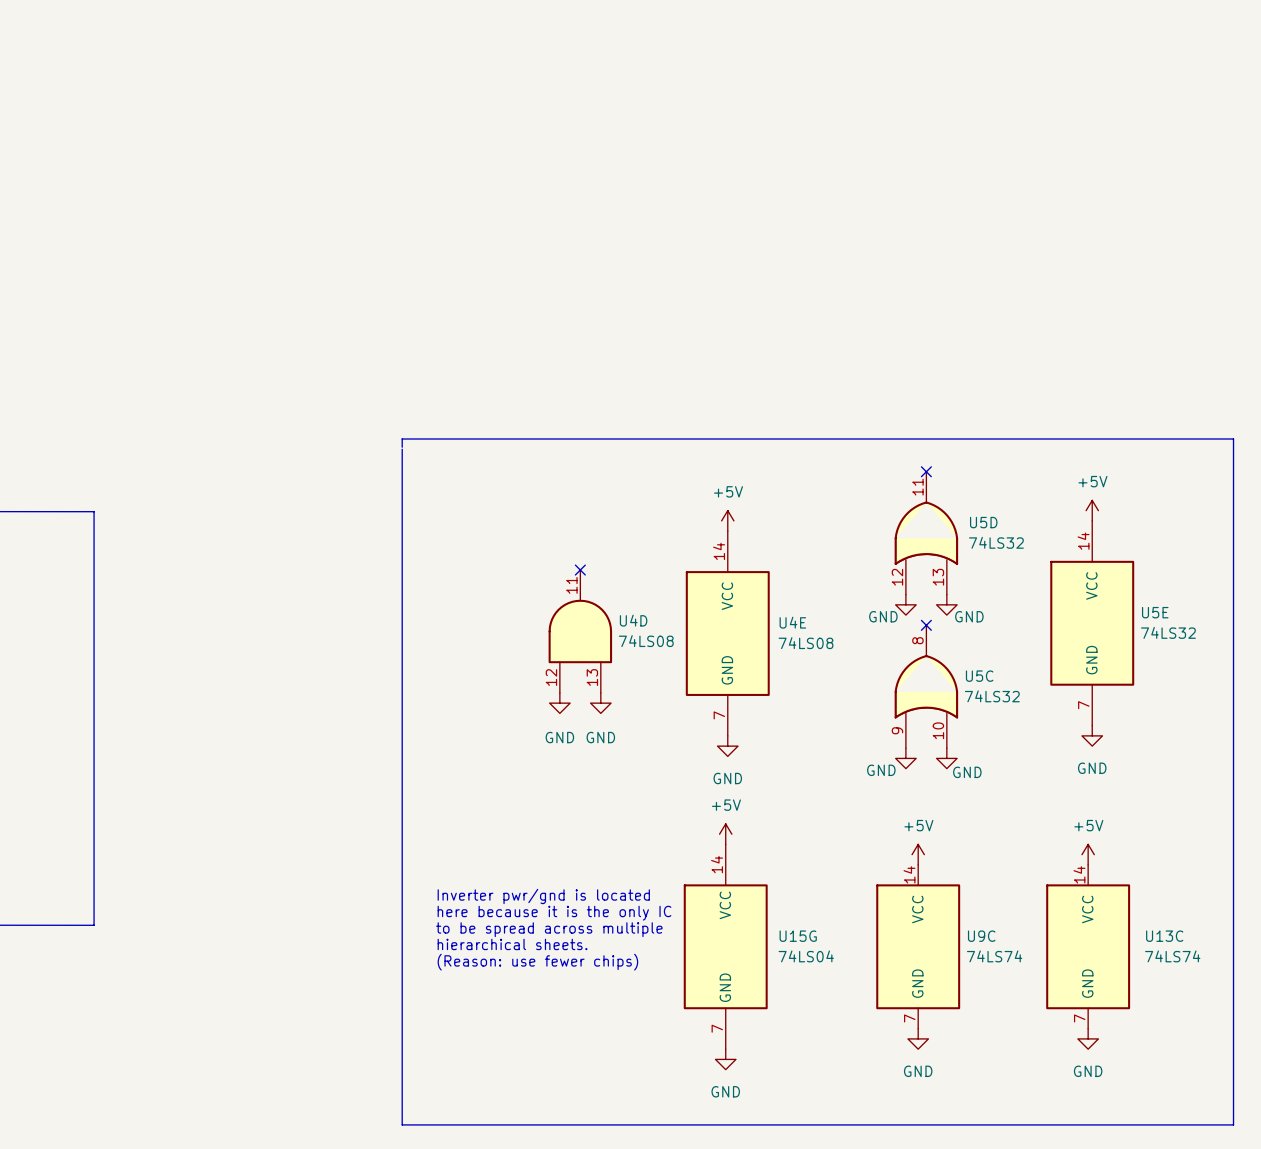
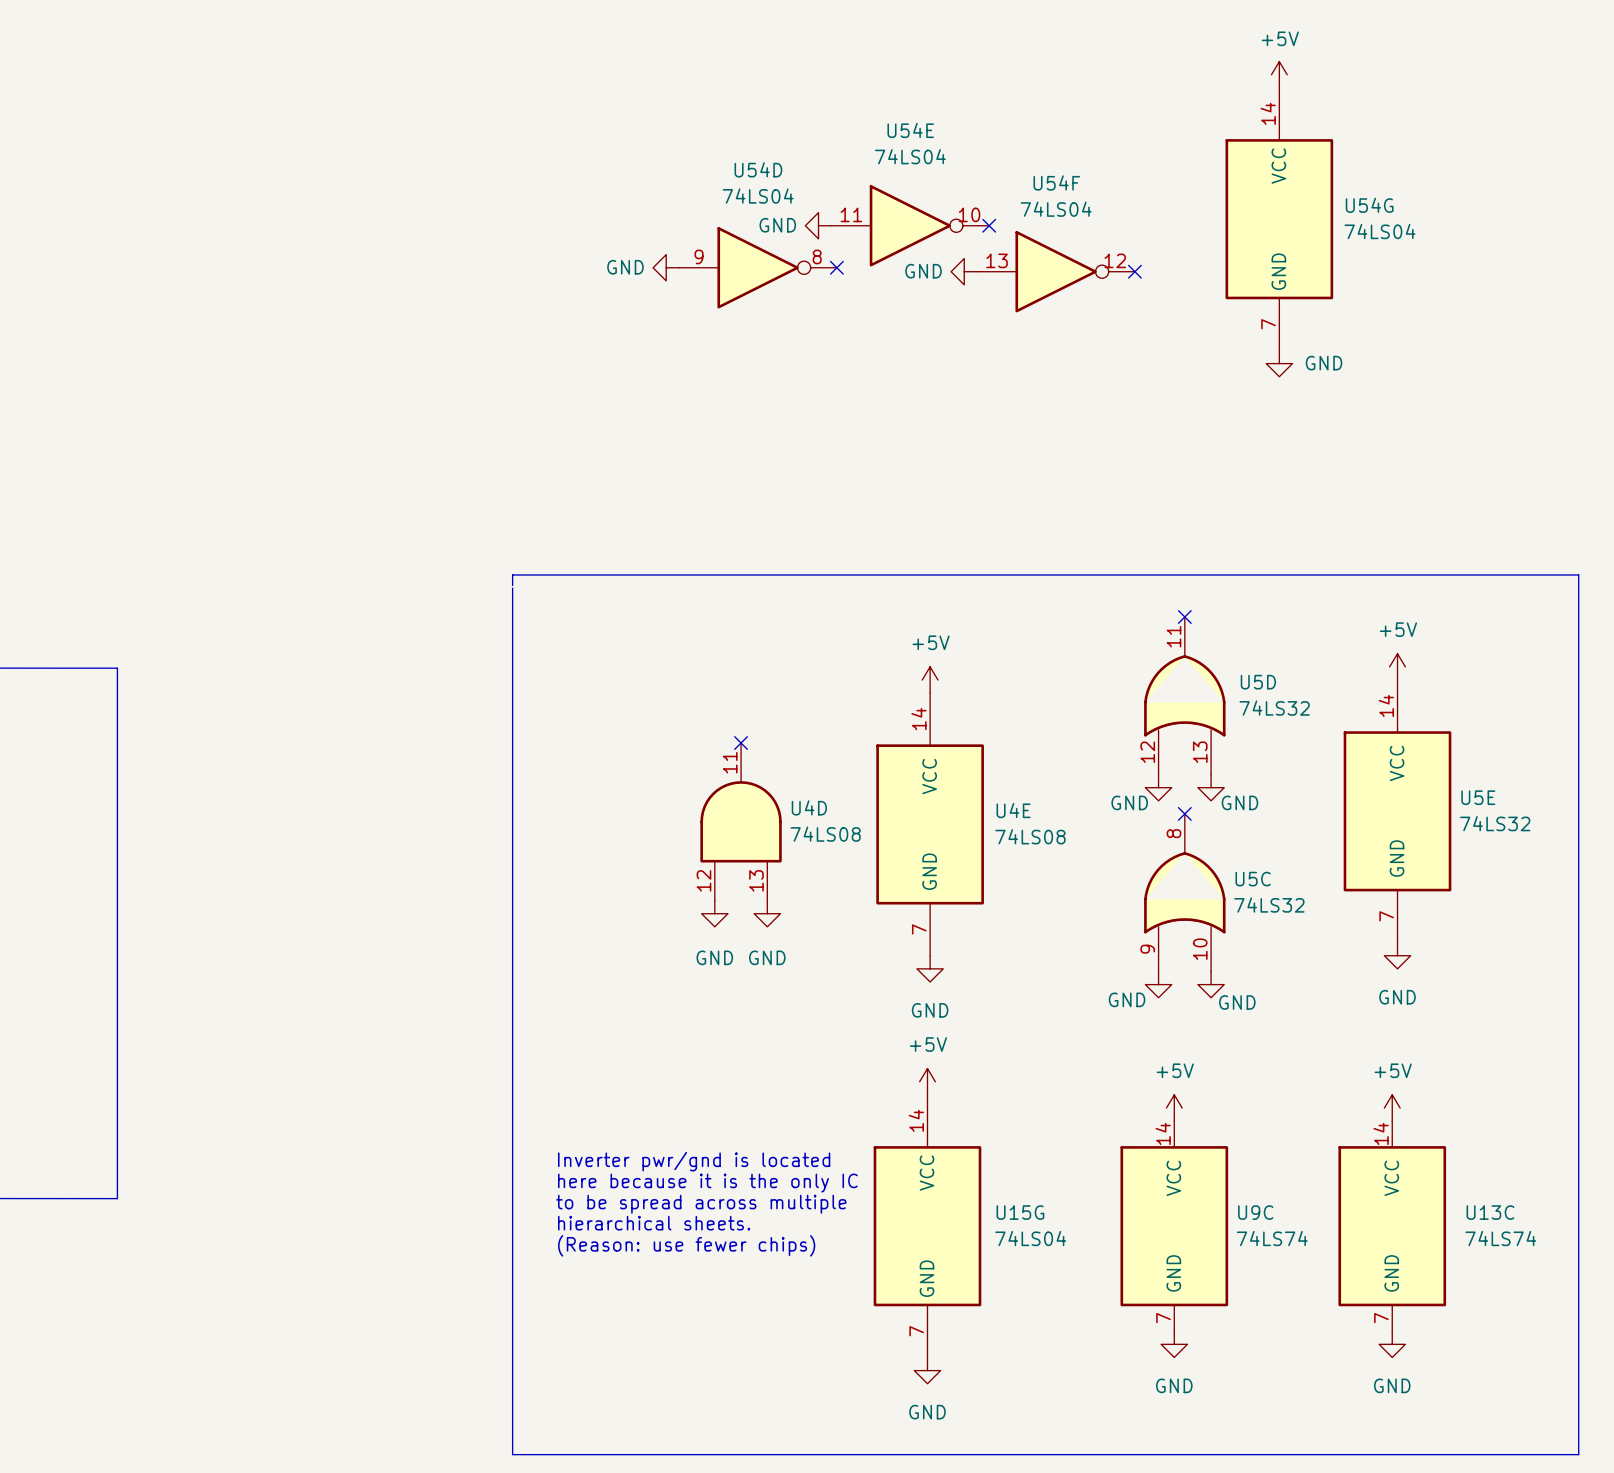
power symbol: none -> +5V (1279, 74)
U54G: none -> 74LS04 (1279, 219)
power symbol: none -> GND (818, 225)
U54E: none -> 74LS04 (910, 225)
no-connect mark: none -> (989, 225)
power symbol: none -> GND (666, 267)
U54D: none -> 74LS04 (758, 267)
no-connect mark: none -> (836, 267)
power symbol: none -> GND (964, 271)
U54F: none -> 74LS04 (1056, 271)
no-connect mark: none -> (1134, 271)
power symbol: none -> GND (1279, 363)

